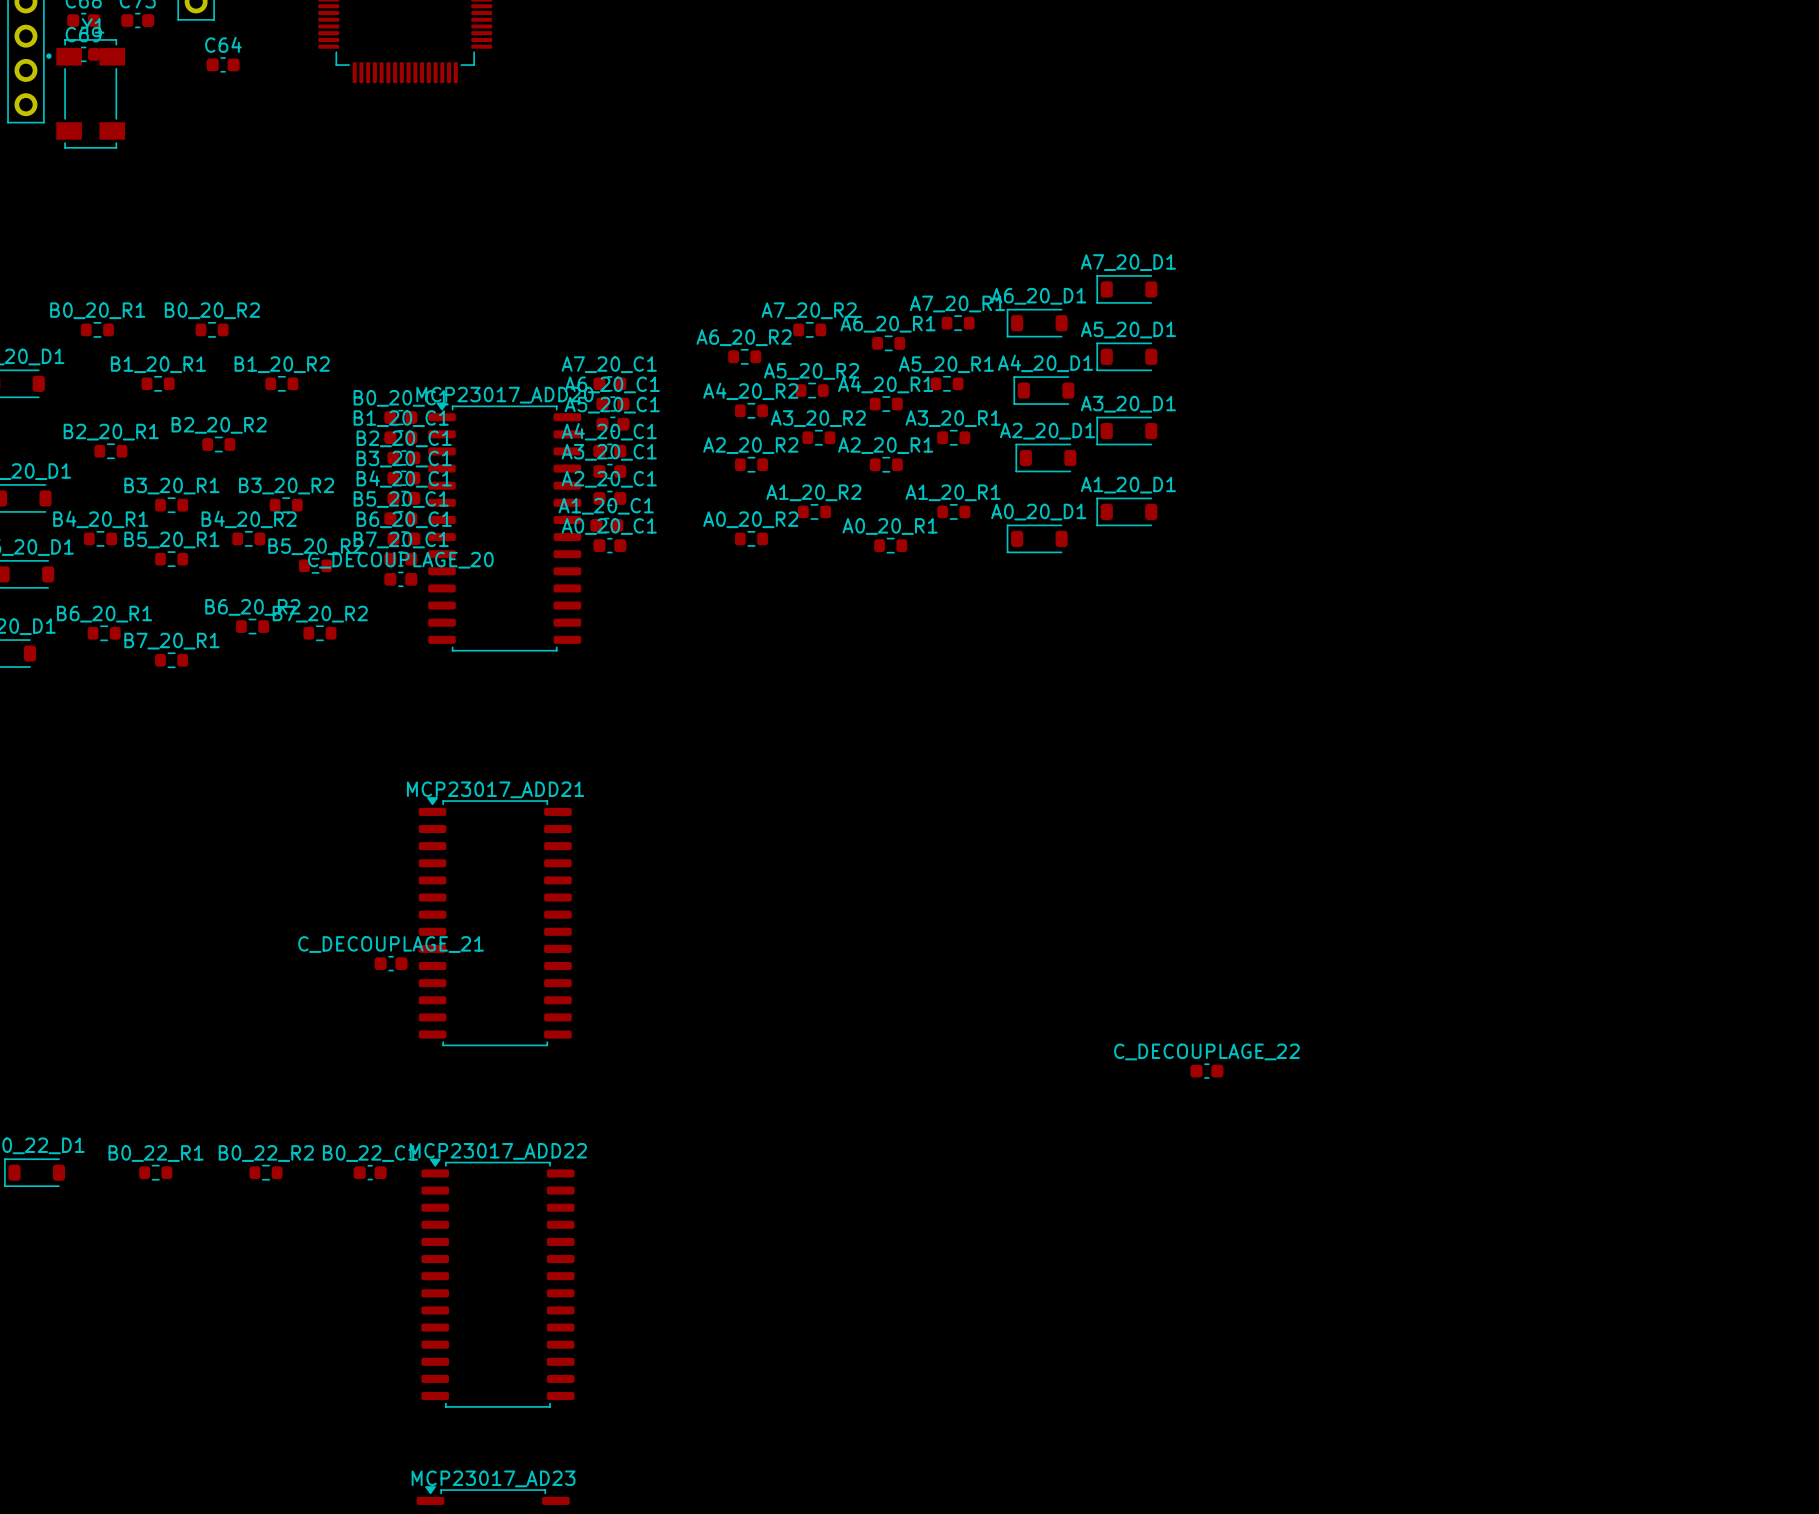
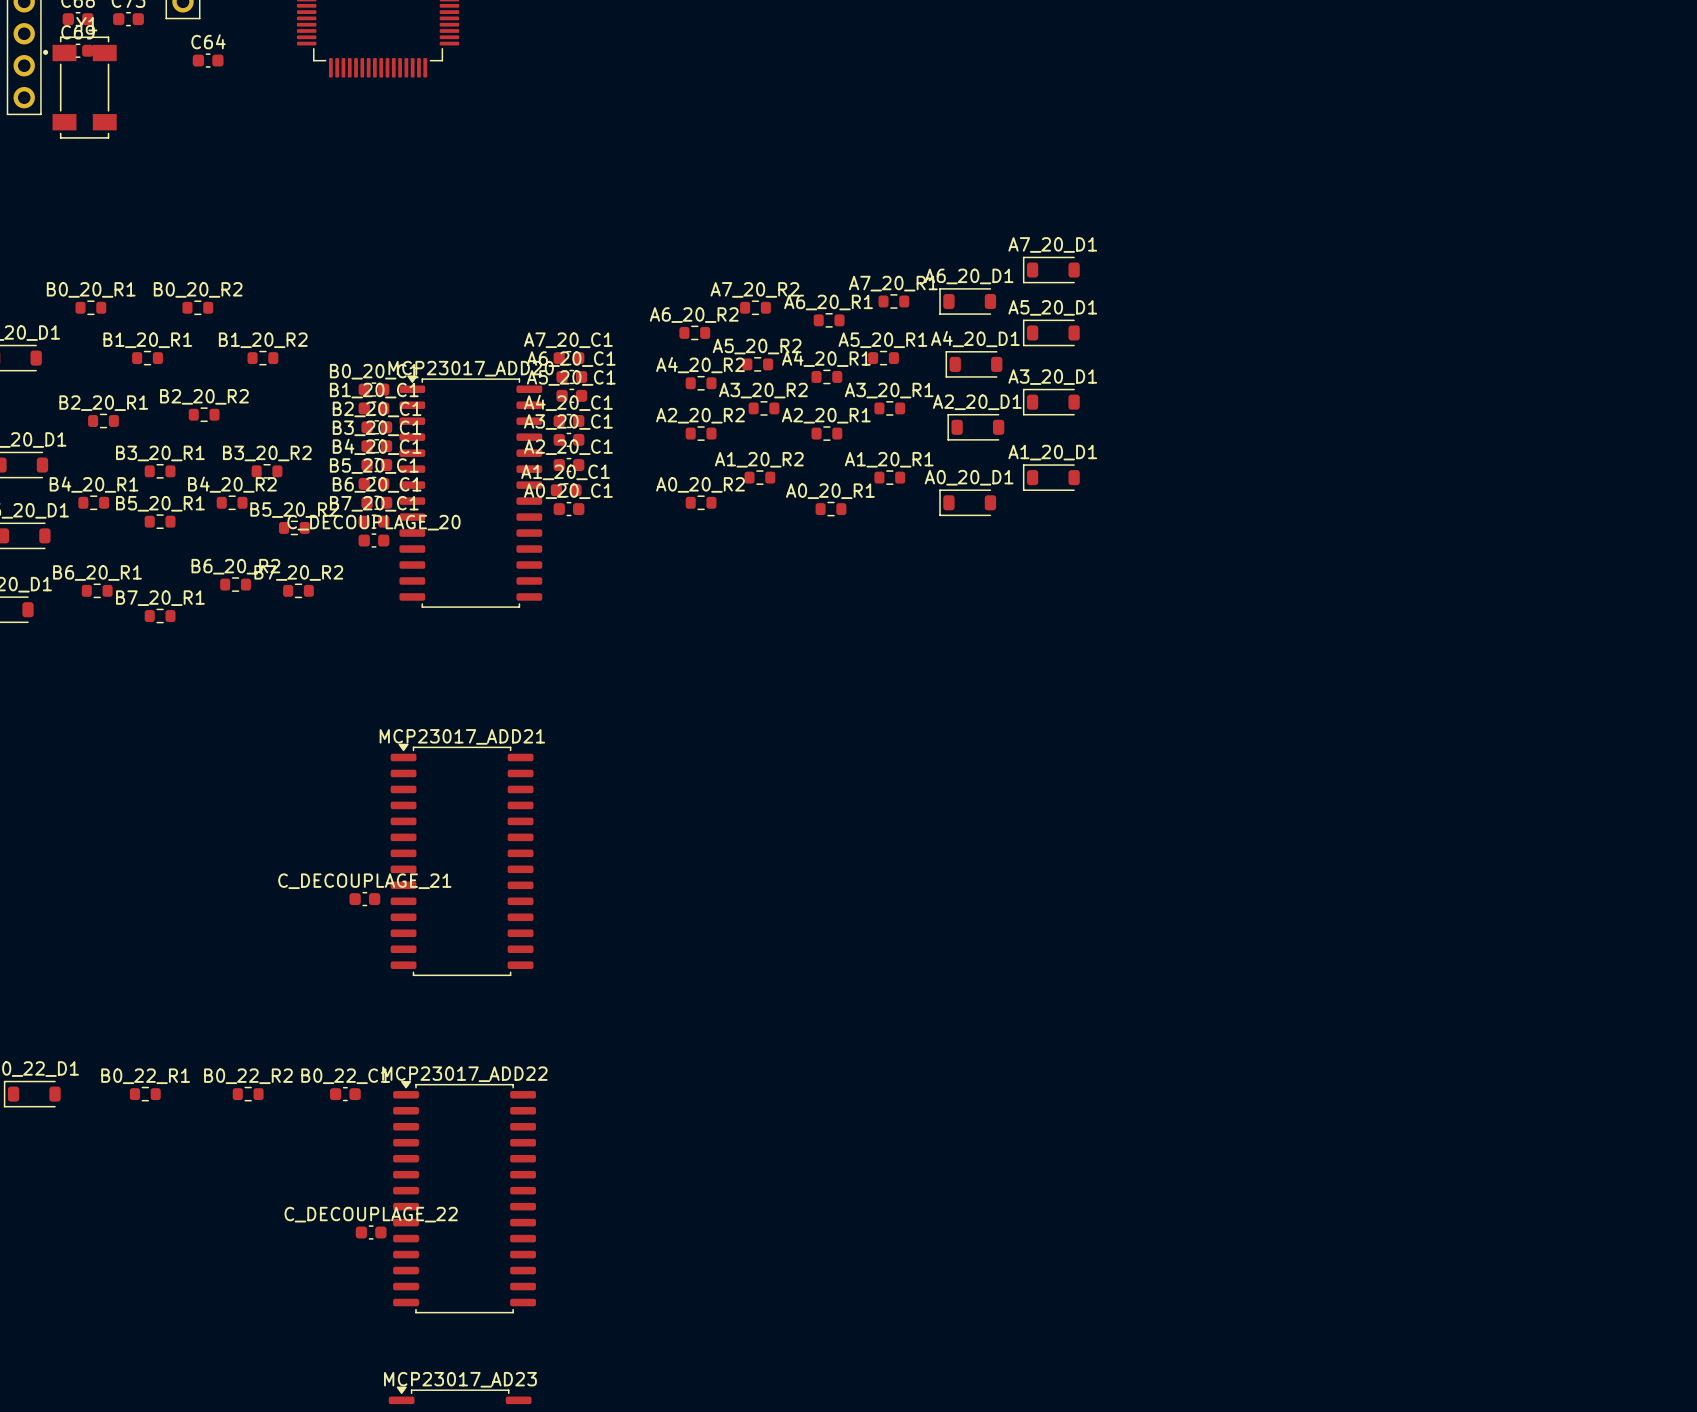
C_DECOUPLAGE_22 position: (1206, 1071) -> (371, 1232)

